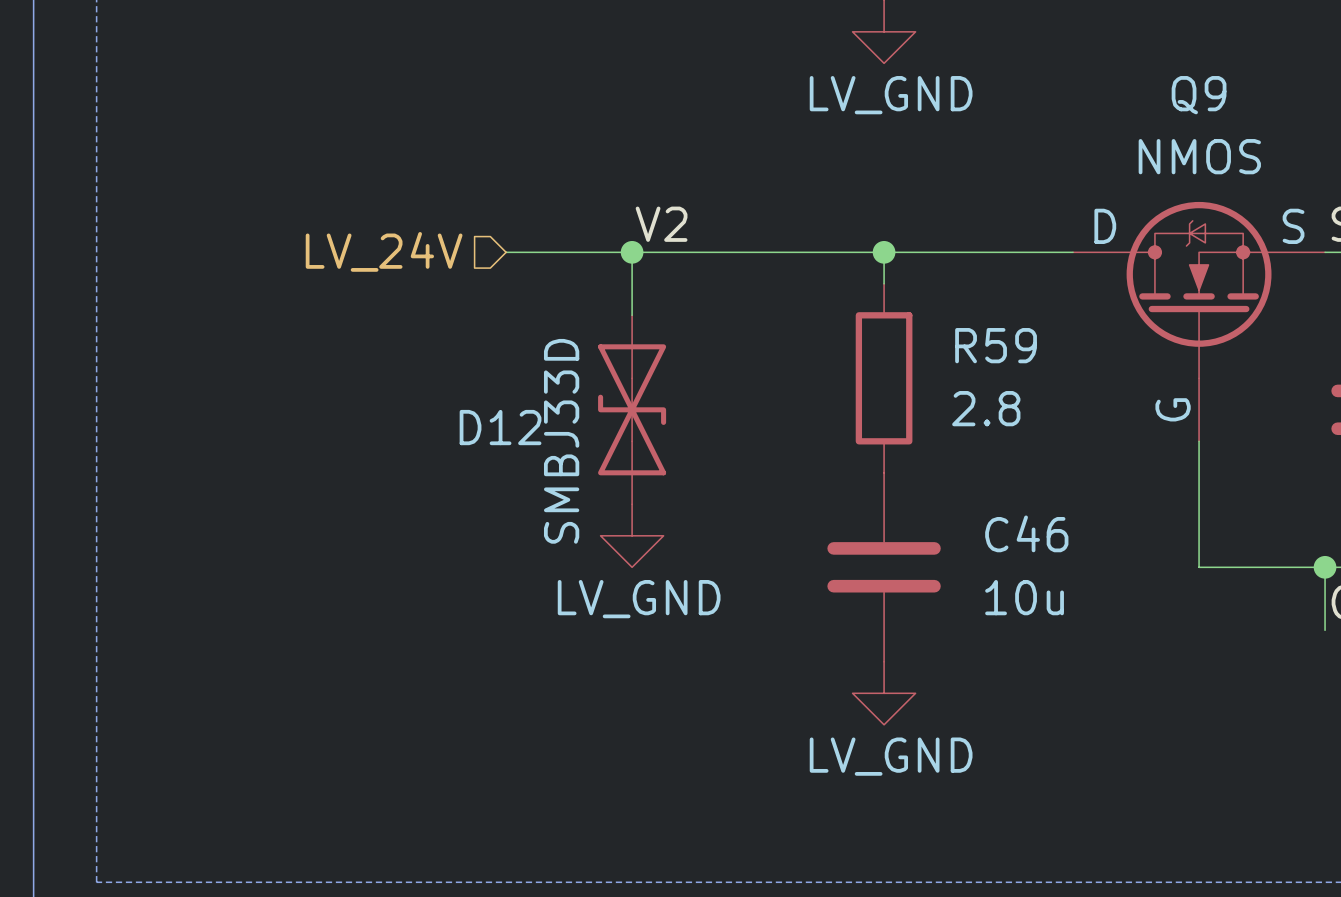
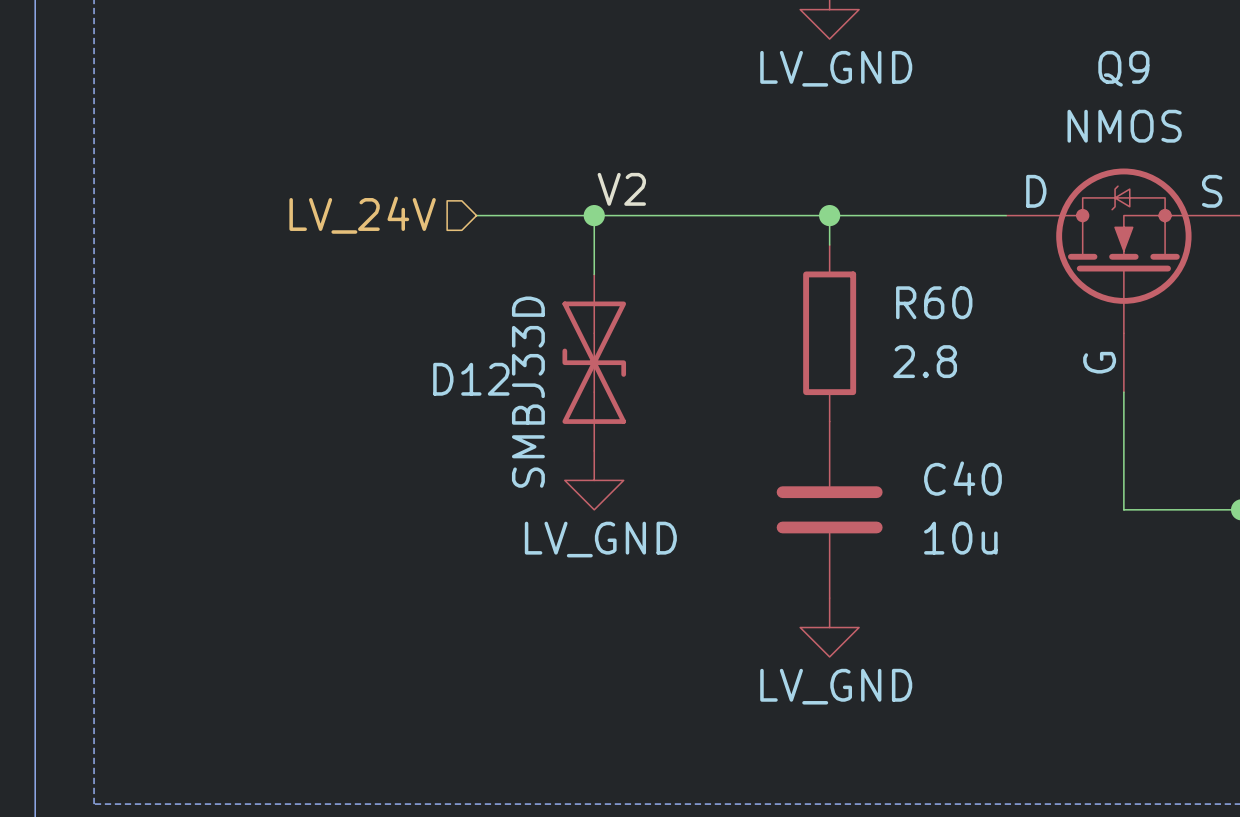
R59 name: R59 (996, 345) -> R60 (934, 302)
C46 name: C46 (1026, 533) -> C40 (962, 478)

